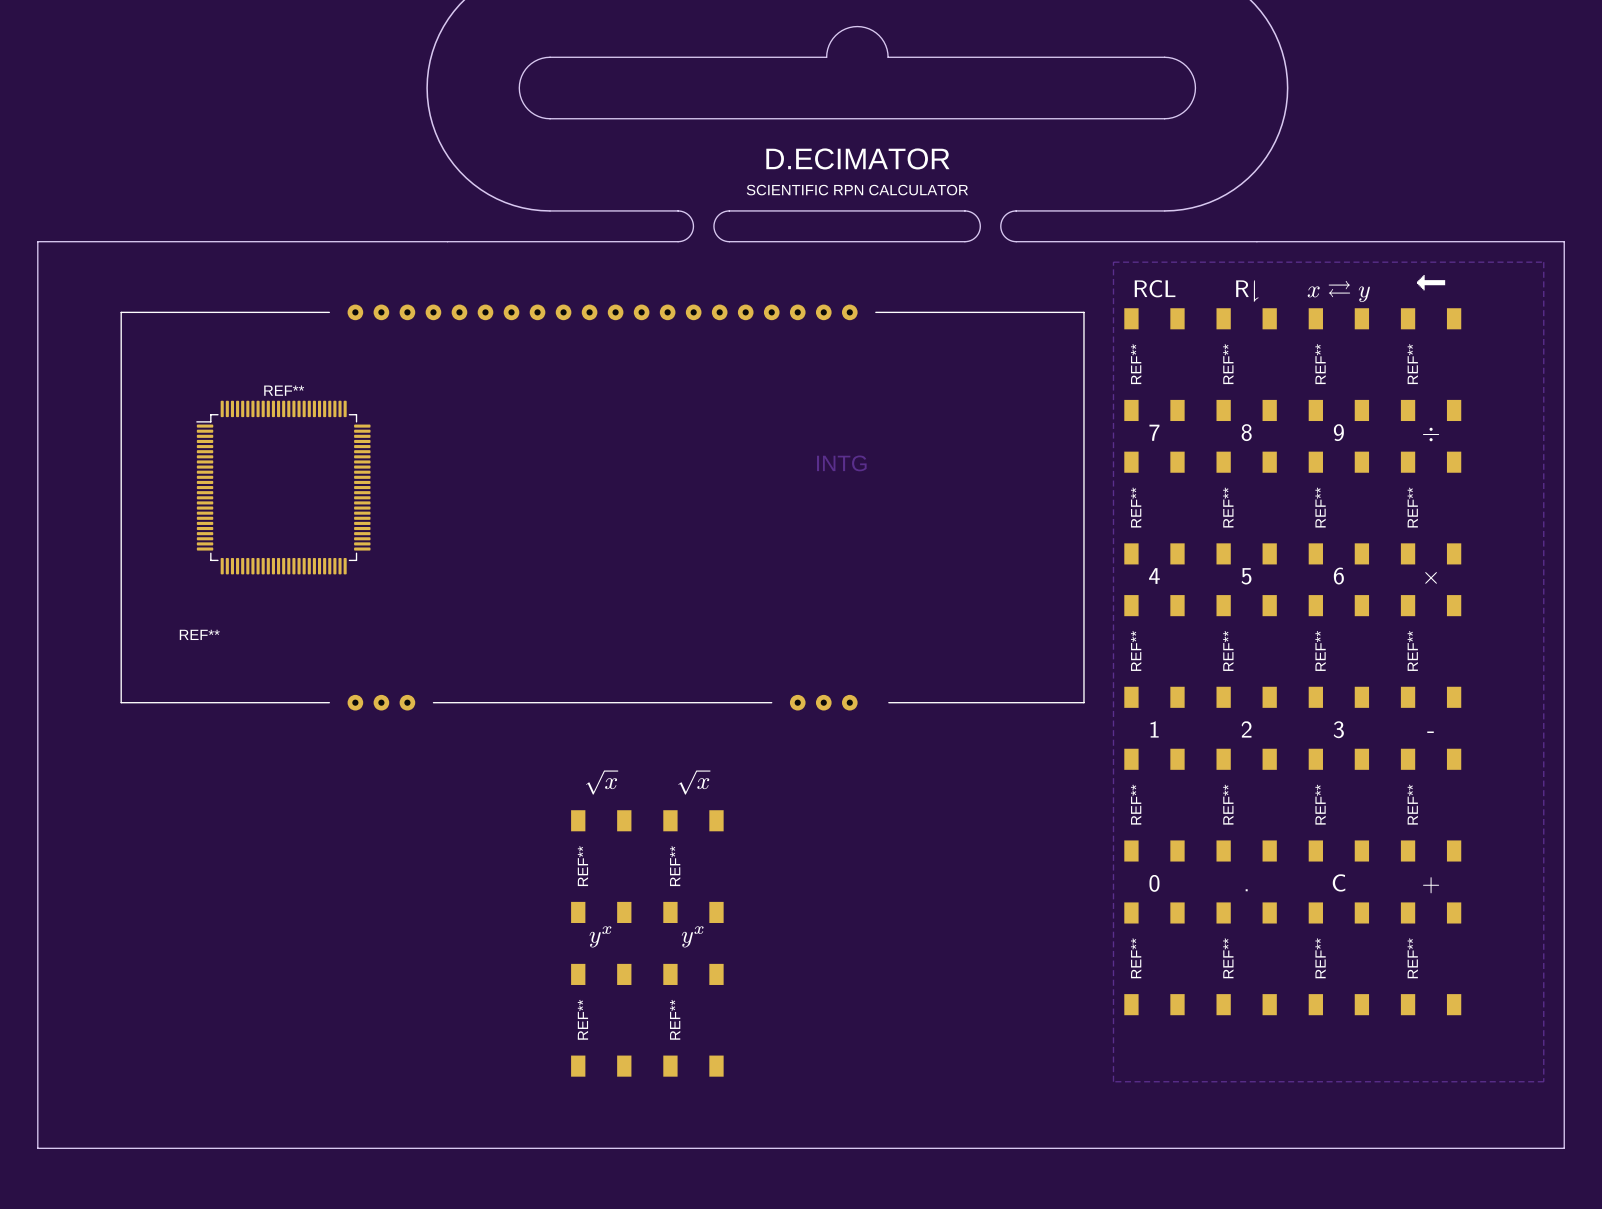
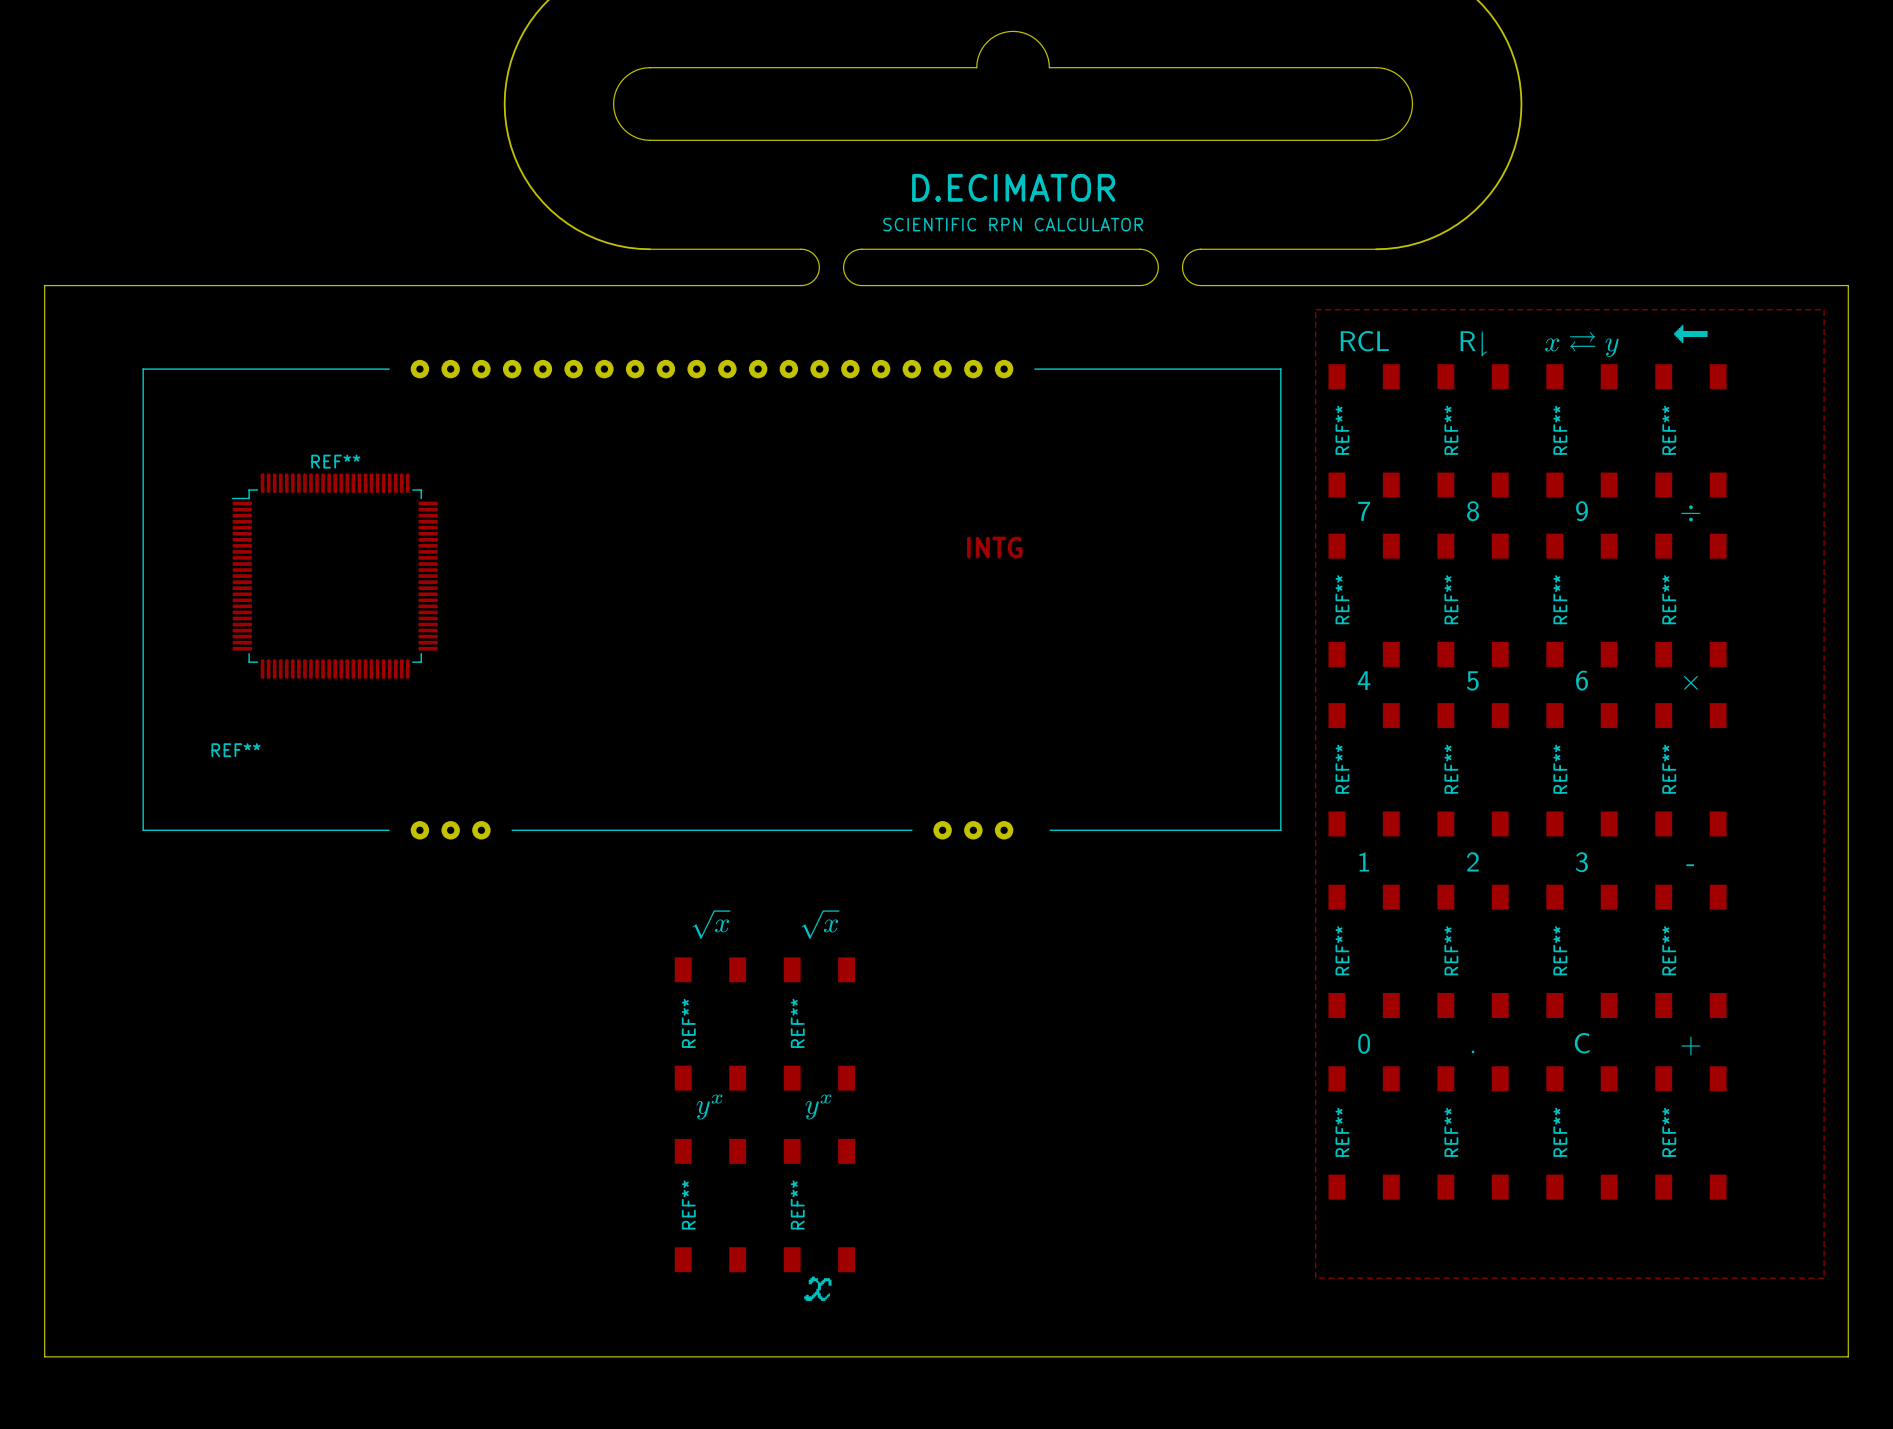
drawing: none -> [804, 1276, 832, 1301]

